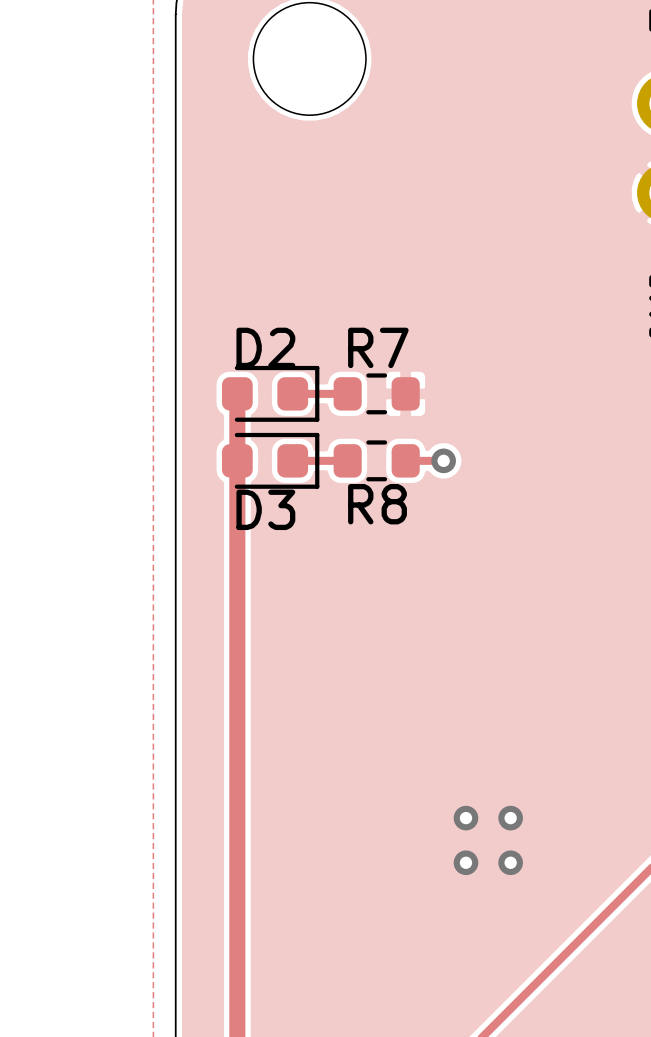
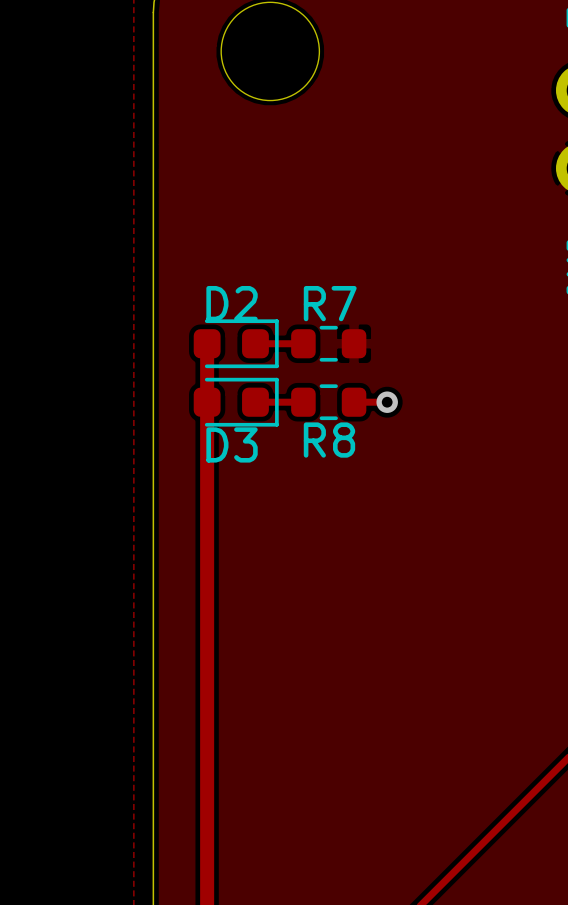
via: (465, 818) -> none
via: (510, 818) -> none
via: (465, 862) -> none
via: (510, 862) -> none

